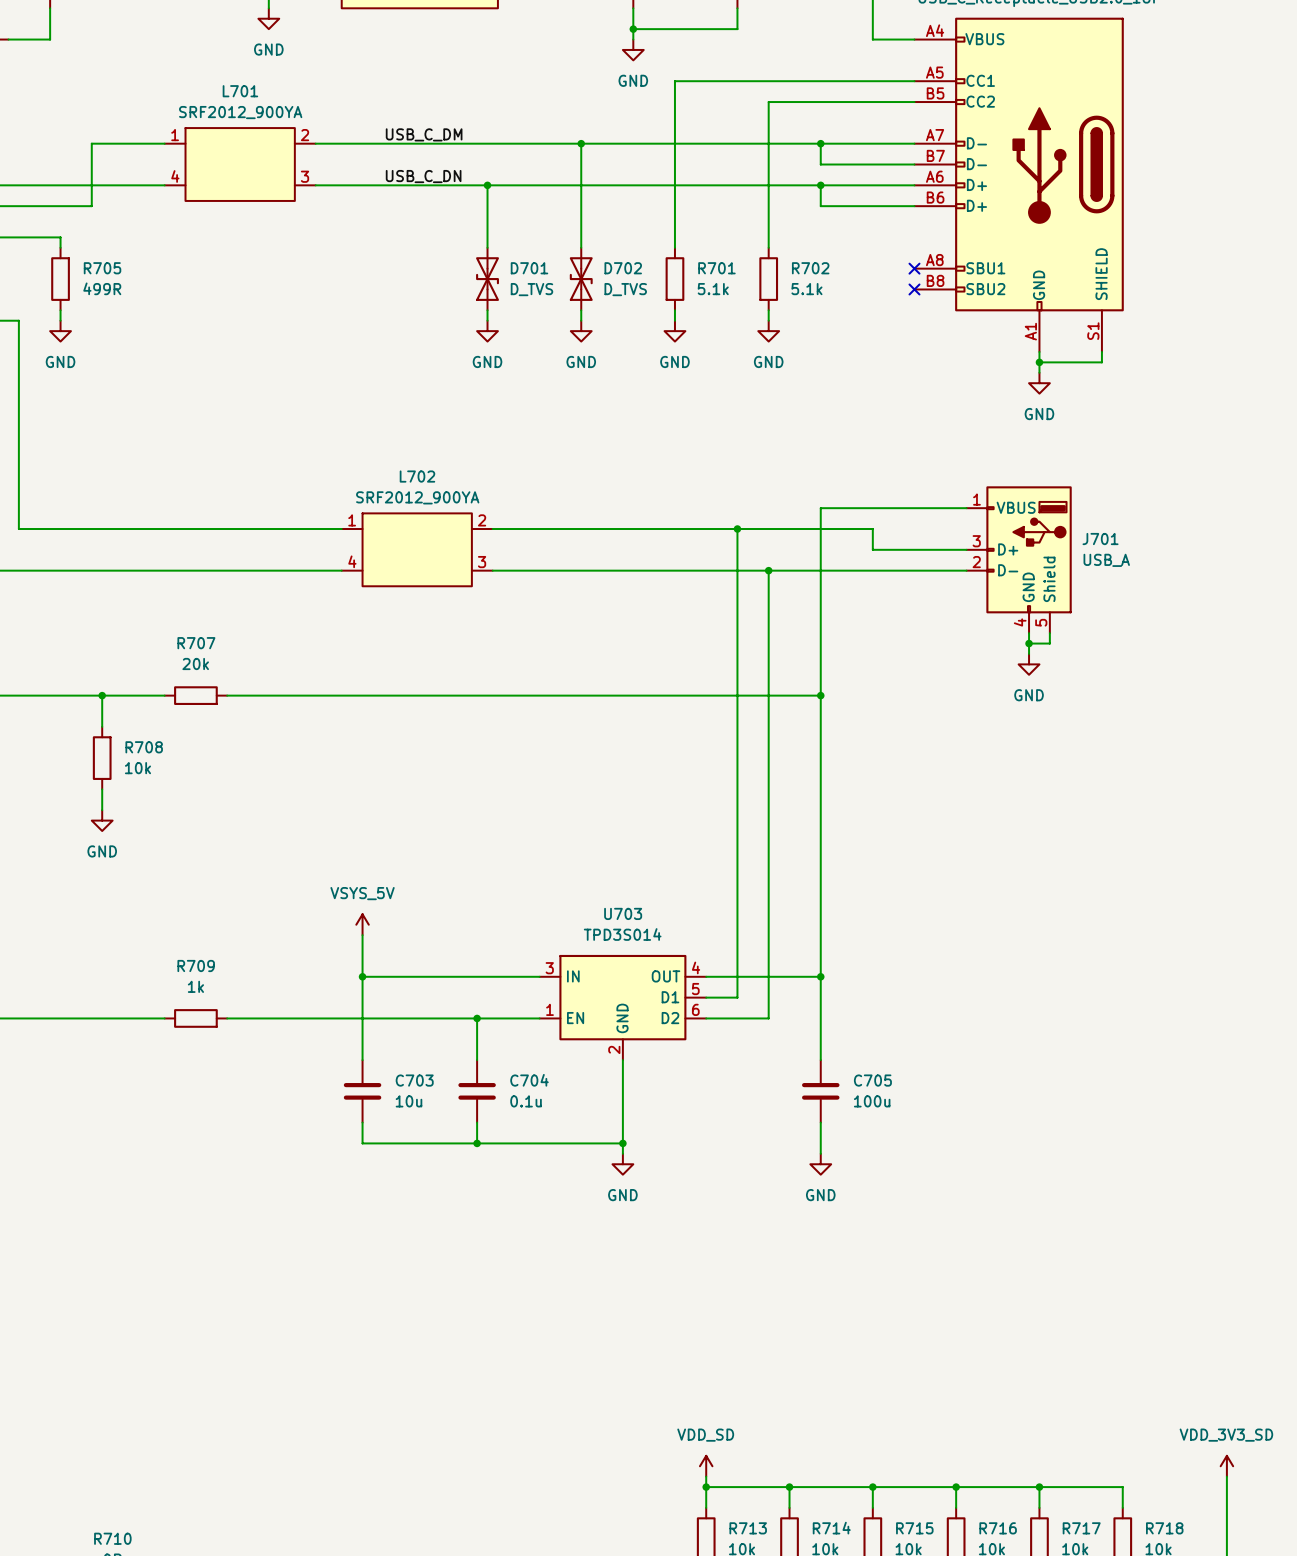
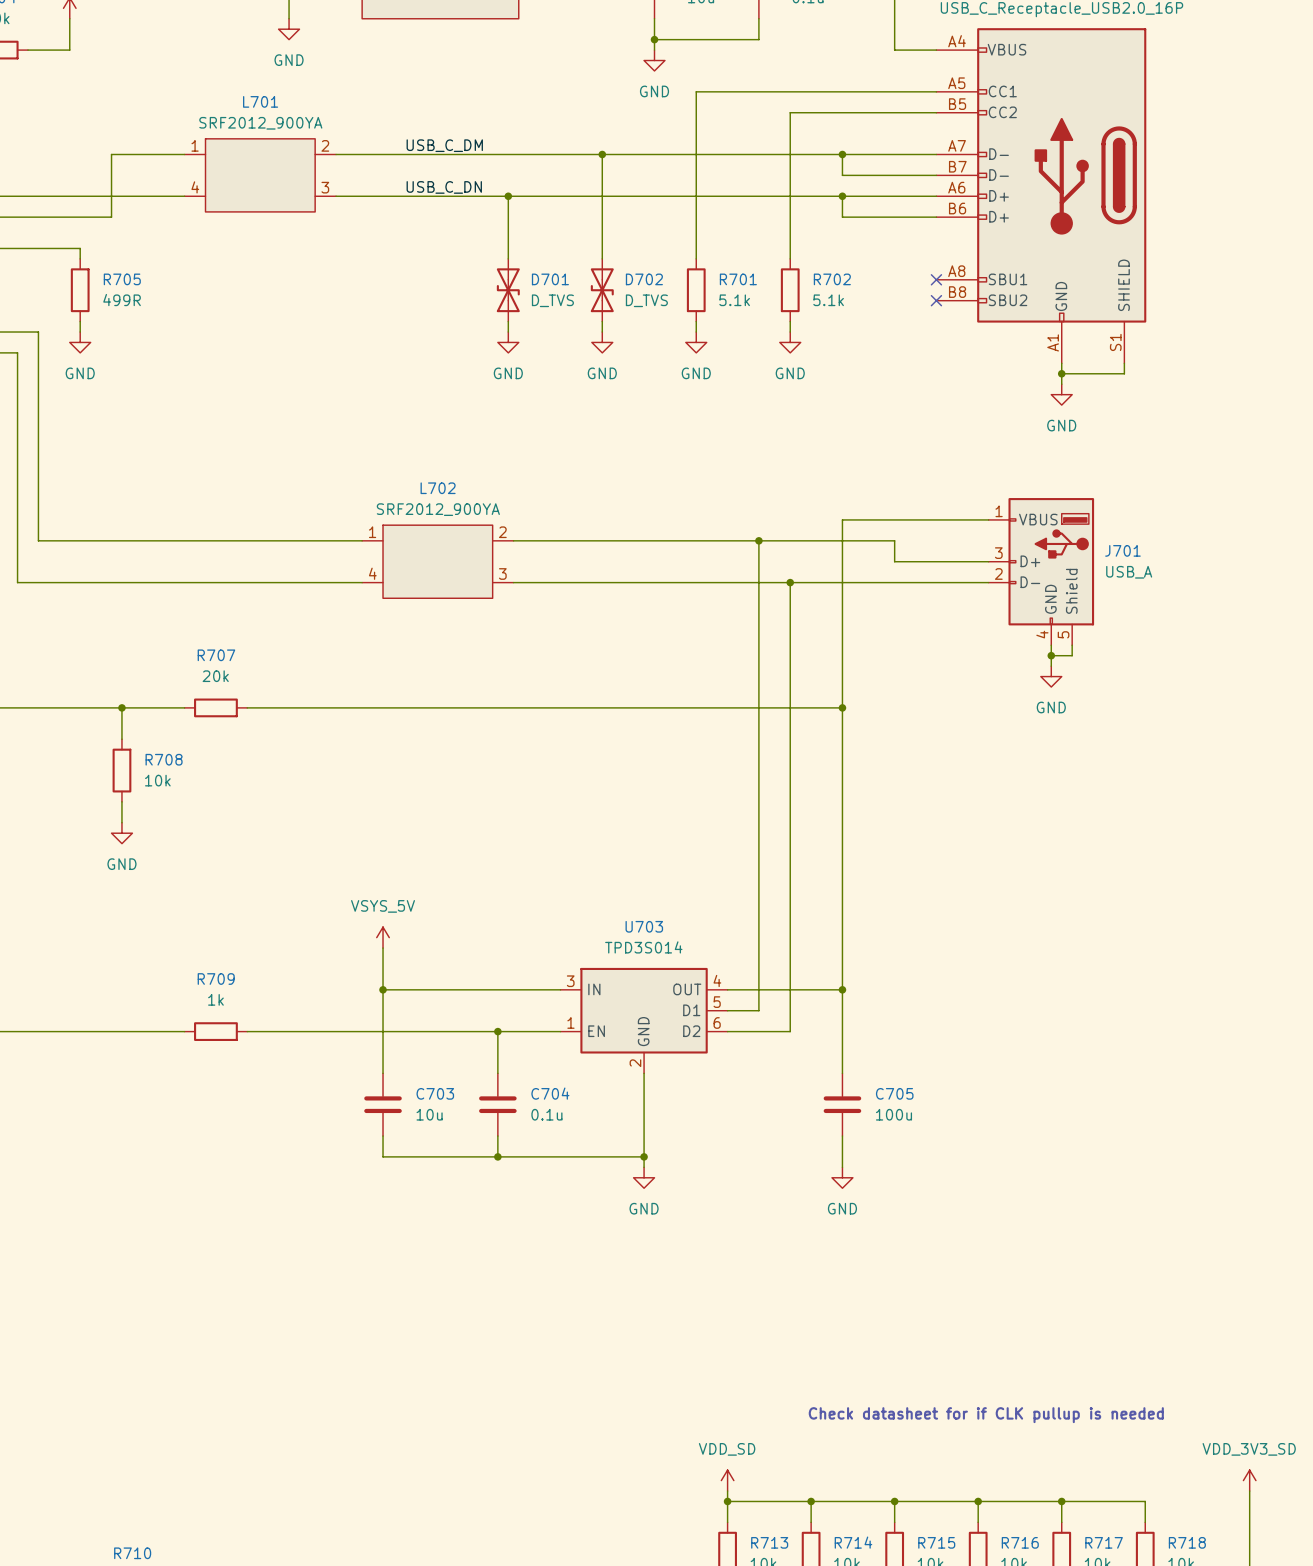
text: none -> Check datasheet for if CLK pullup is needed (986, 1415)

